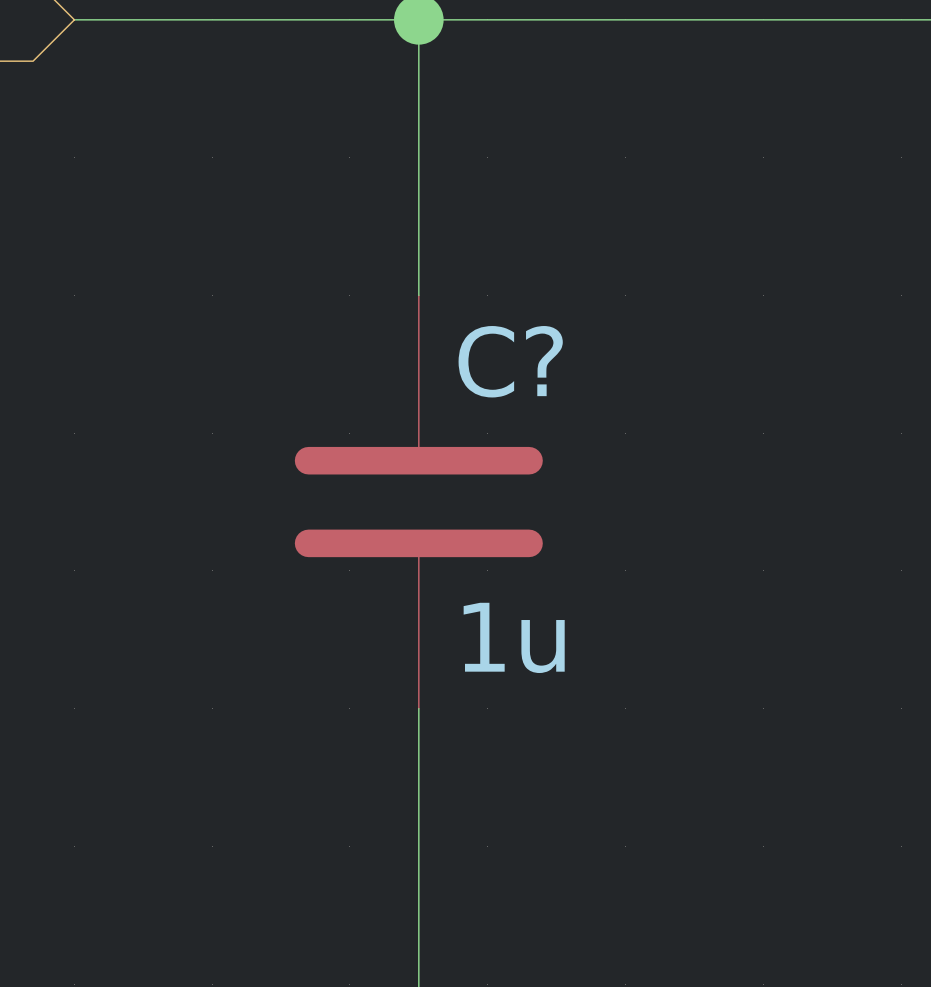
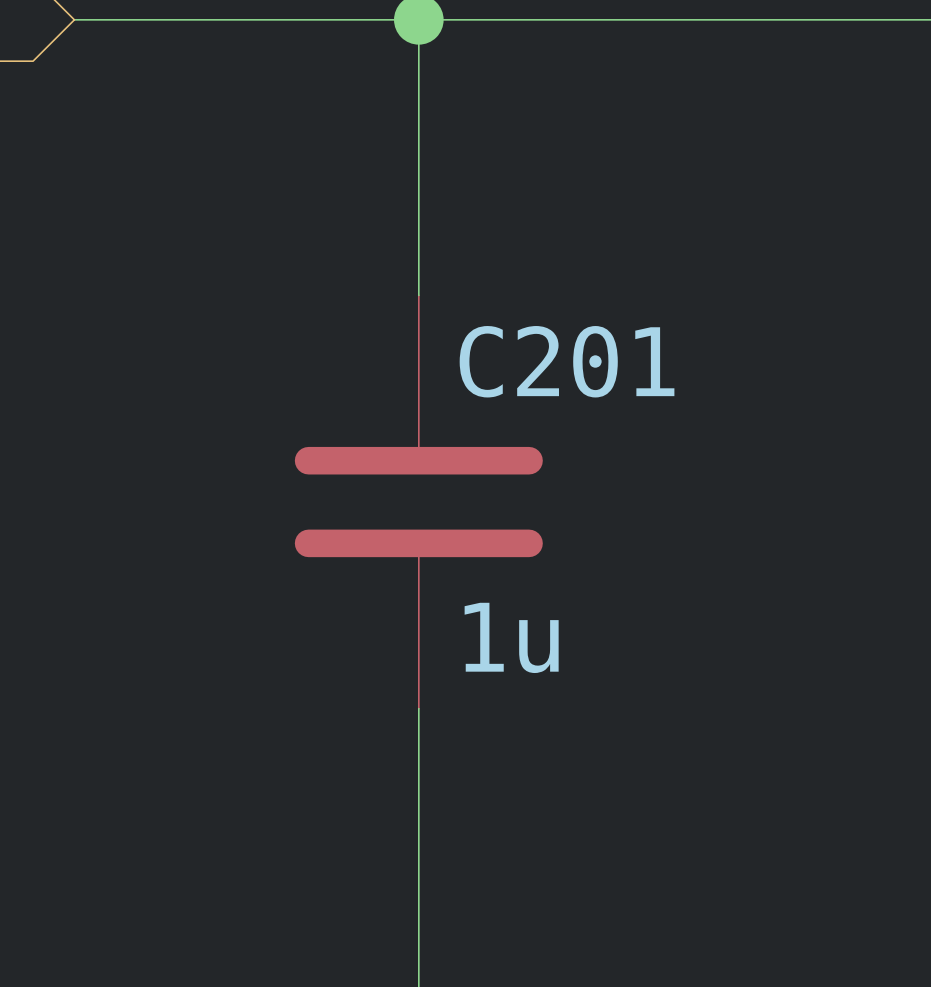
C? name: C? (510, 361) -> C201 (567, 361)

